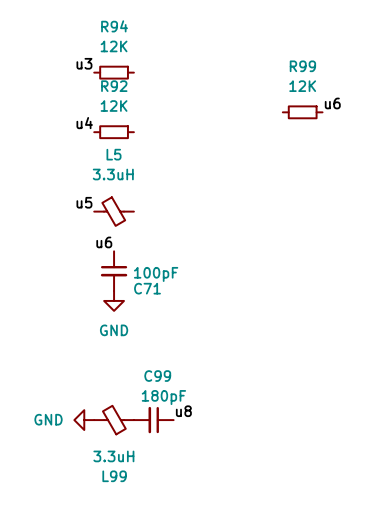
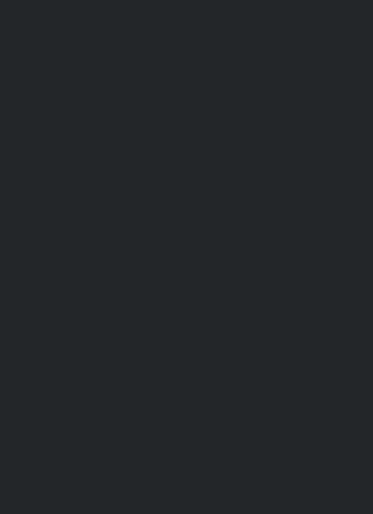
label: u3 (84, 63) -> none
R94: 12K (114, 72) -> none
label: u6 (332, 103) -> none
R99: 12K (302, 112) -> none
label: u4 (84, 123) -> none
R92: 12K (114, 132) -> none
label: u5 (84, 202) -> none
L5: 3.3uH (114, 211) -> none
label: u6 (104, 242) -> none
C71: 100pF (114, 271) -> none
power symbol: GND (114, 300) -> none
label: u8 (183, 411) -> none
power symbol: GND (84, 420) -> none
L99: 3.3uH (114, 420) -> none
C99: 180pF (153, 420) -> none

